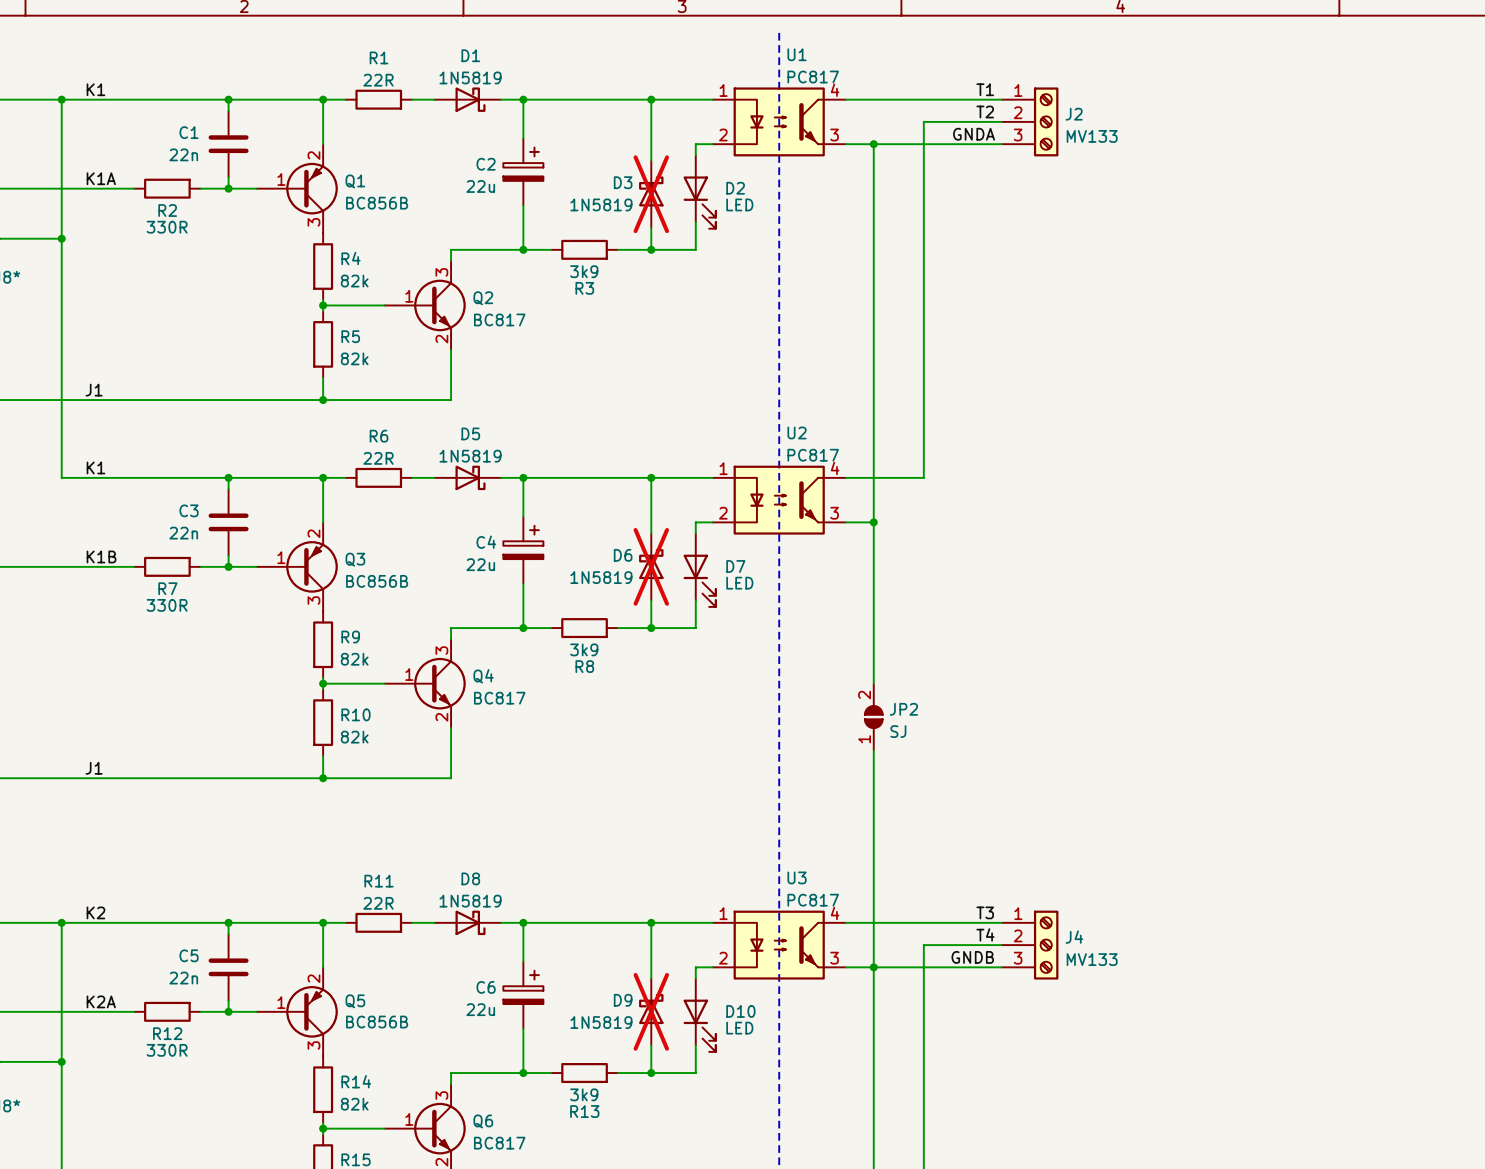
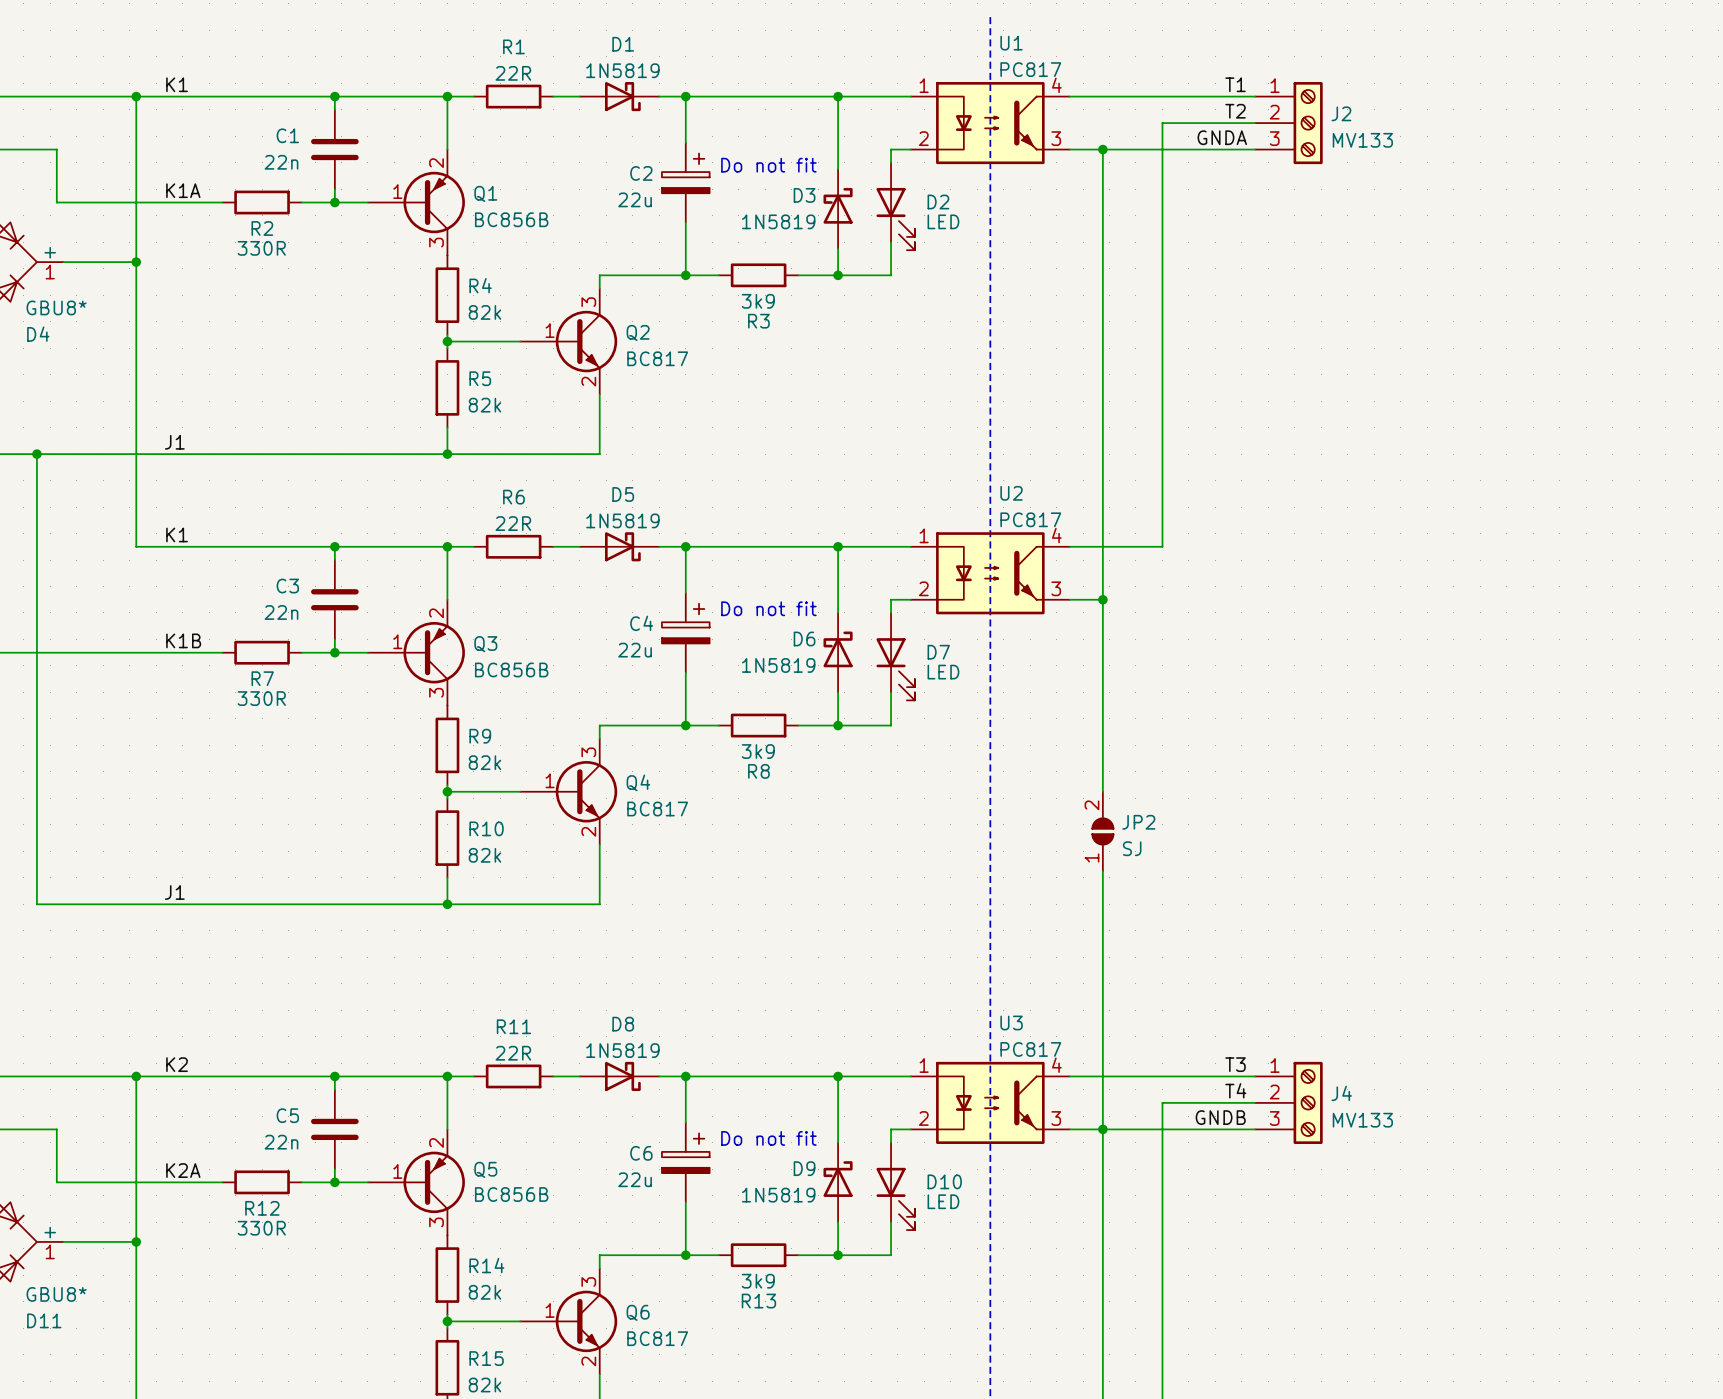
text: none -> Do not fit (768, 165)
D3 do-not-place cross: (651, 194) -> none
text: none -> Do not fit (768, 608)
D6 do-not-place cross: (651, 566) -> none
text: none -> Do not fit (768, 1138)
D9 do-not-place cross: (651, 1011) -> none

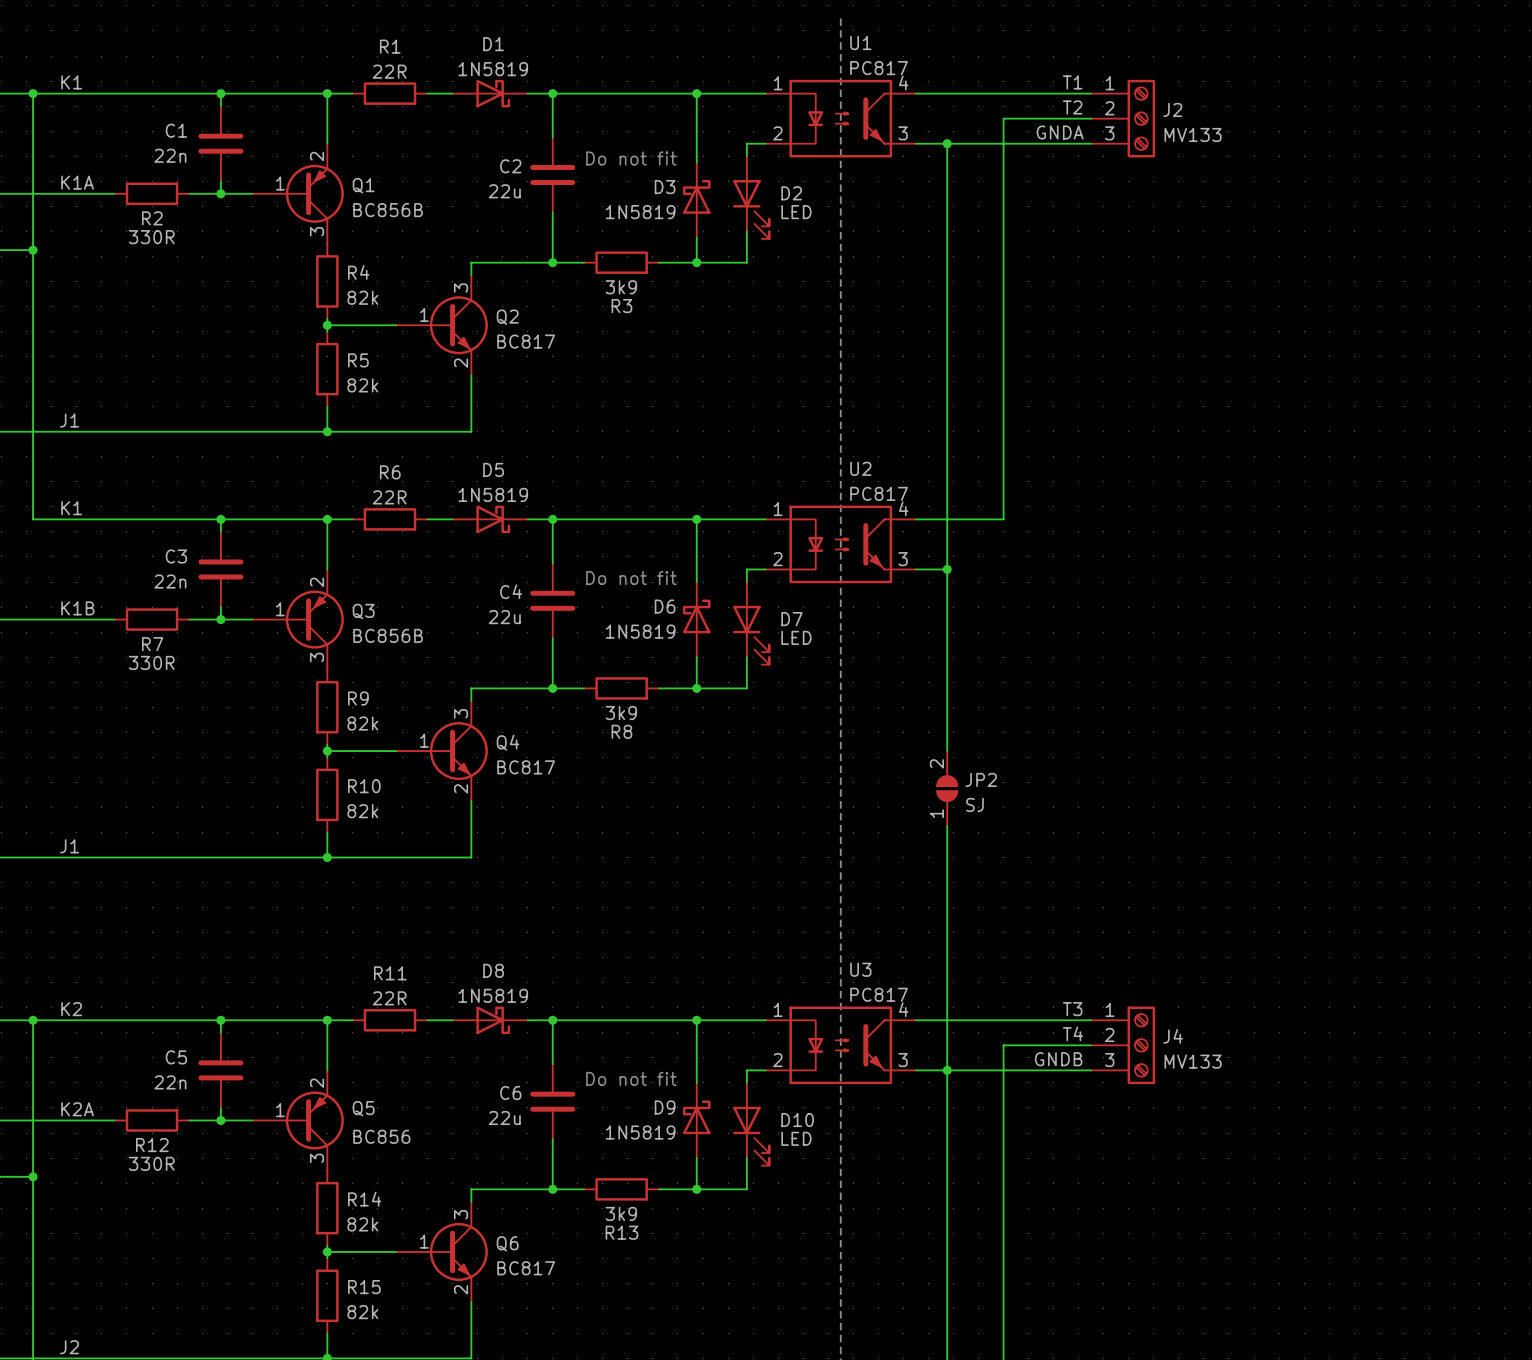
C2 symbol: [661, 142, 710, 223] -> [530, 137, 576, 213]
C4 symbol: [661, 593, 710, 673] -> [530, 563, 576, 639]
C6 symbol: [661, 1122, 710, 1203] -> [530, 1064, 576, 1140]
Q5 value: BC856B (511, 1194) -> BC856 (381, 1136)

